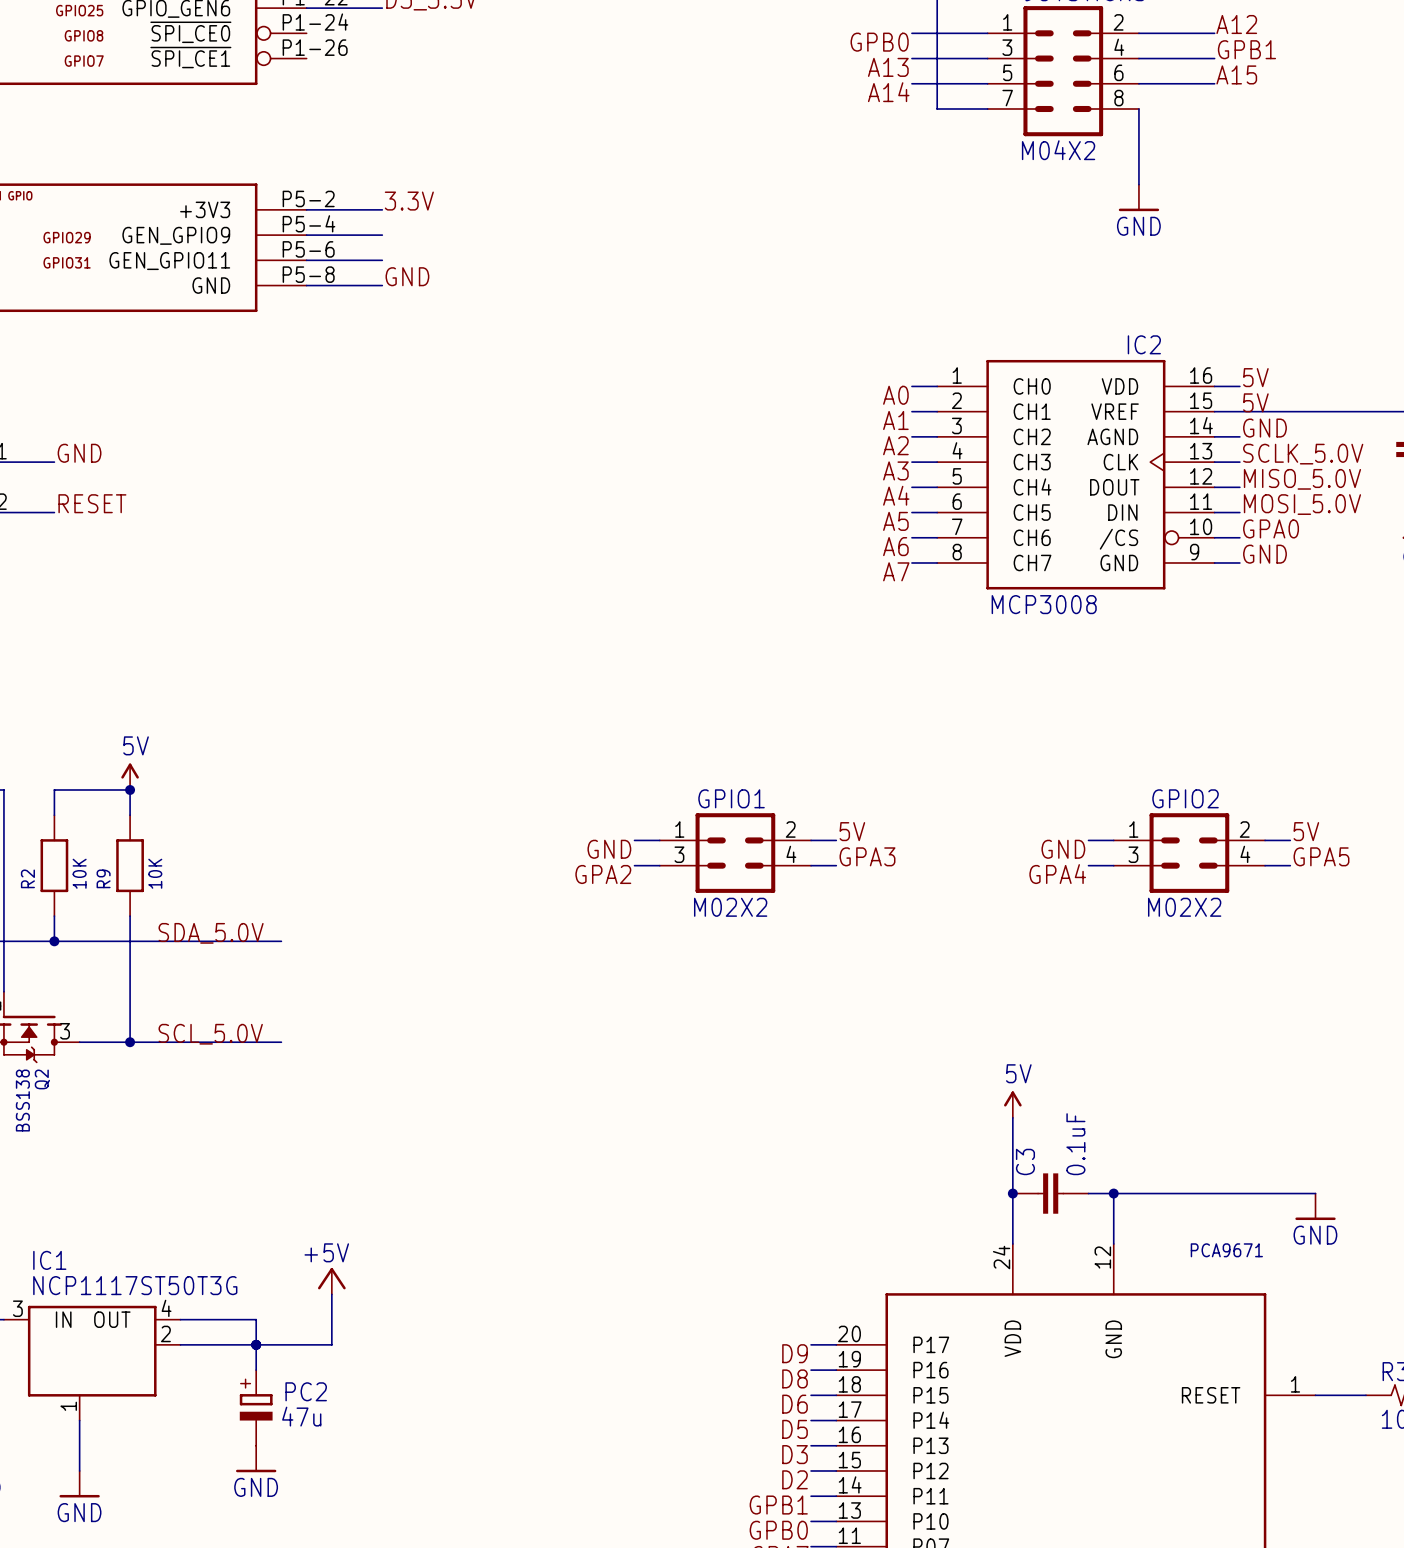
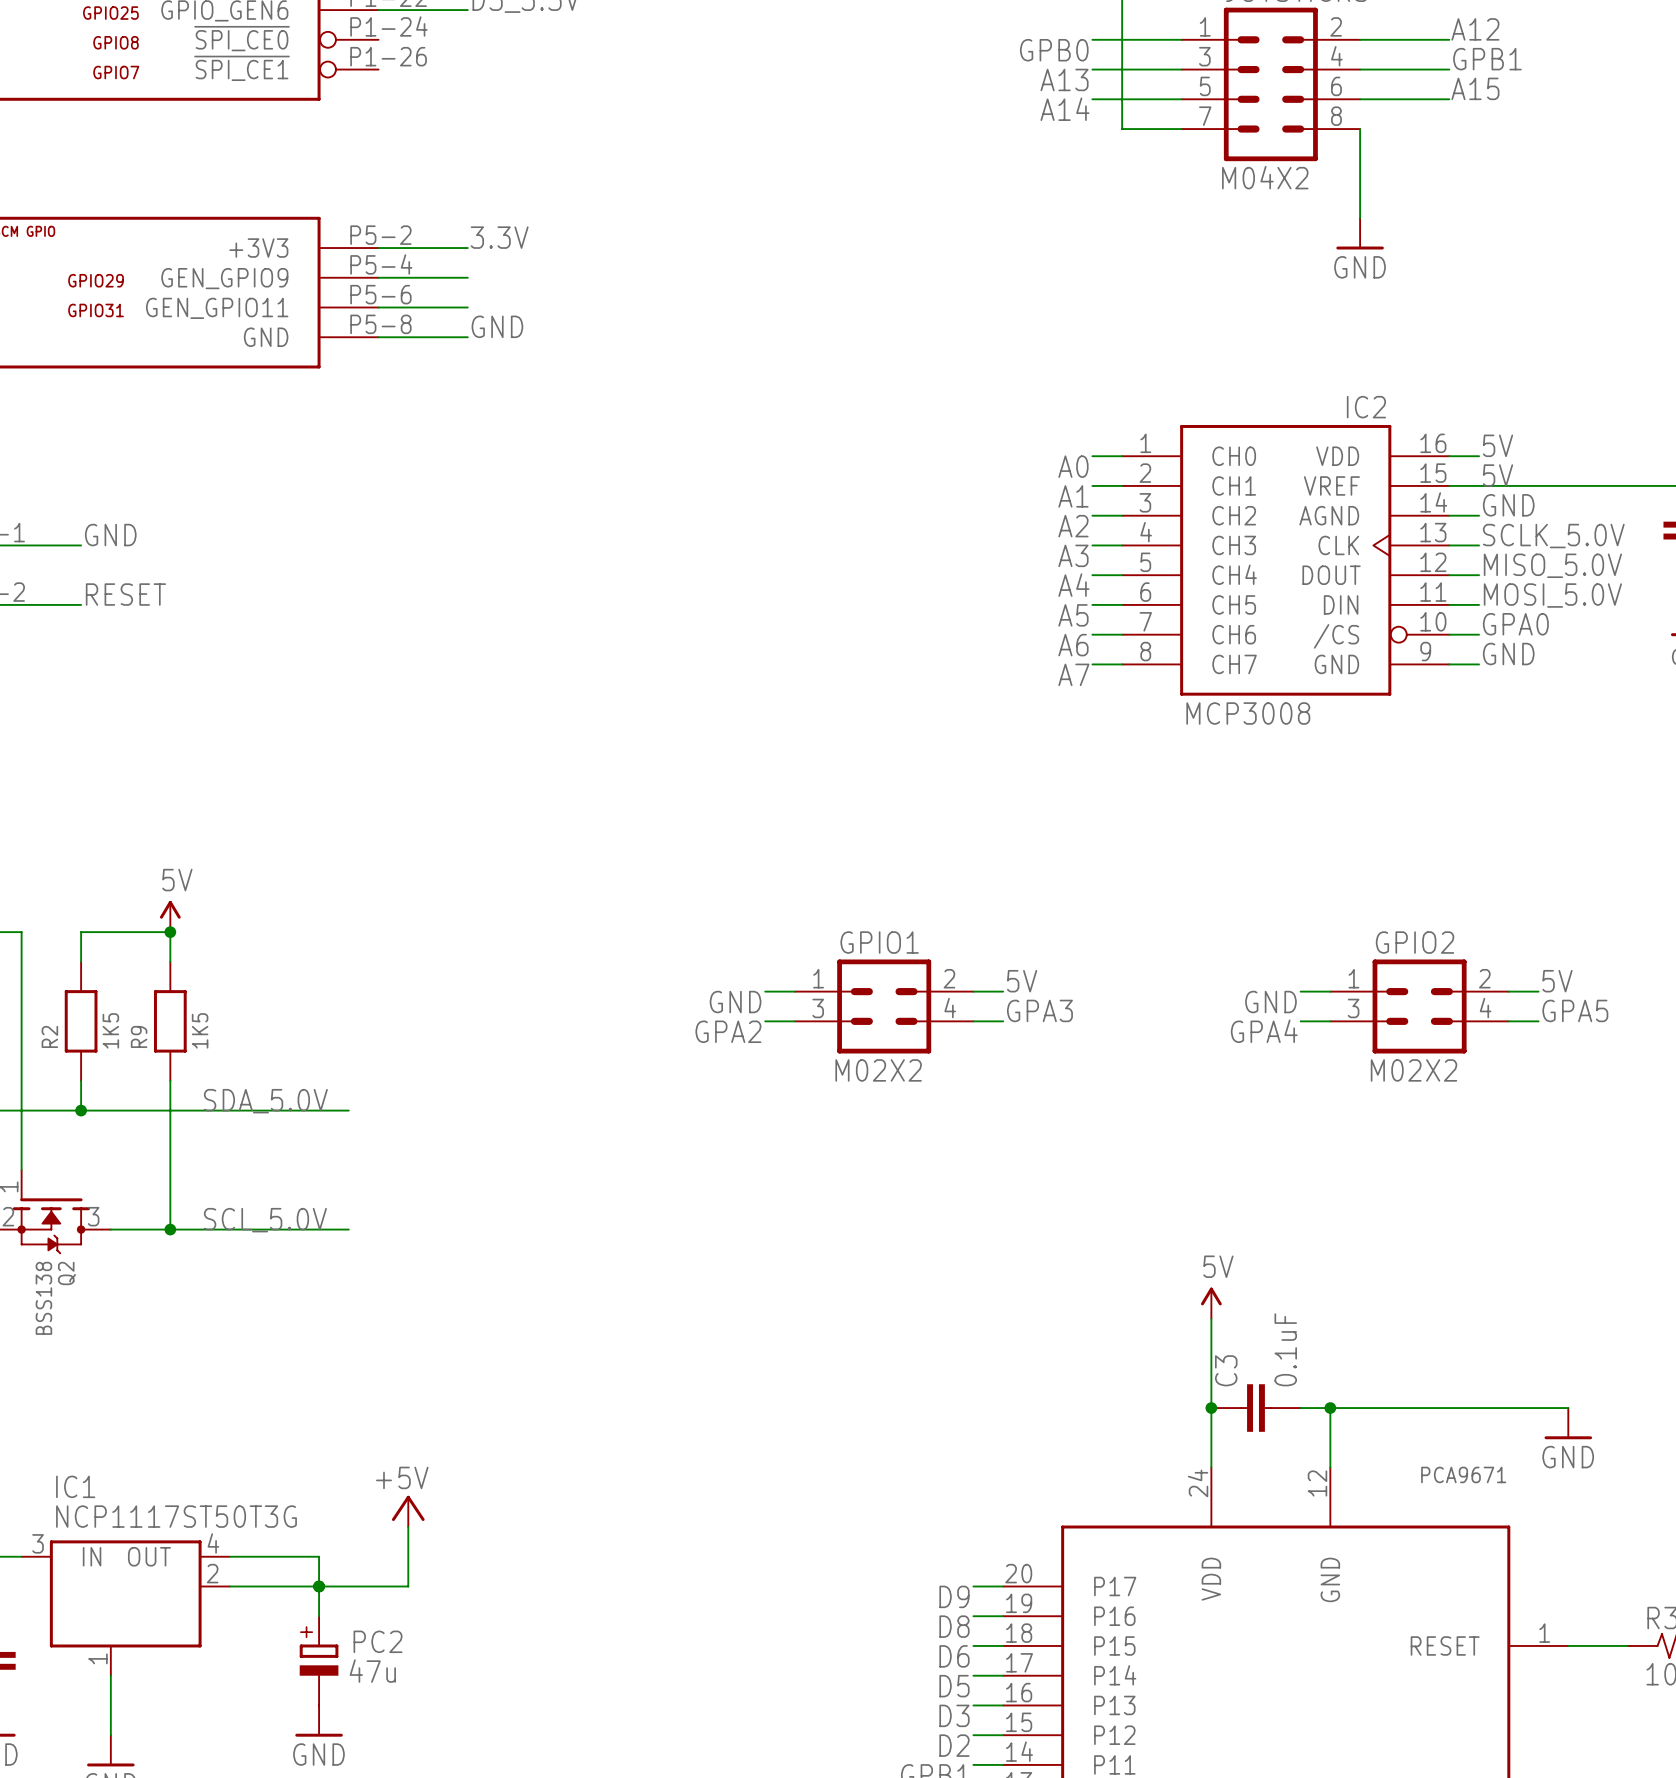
R2 value: 10K (79, 873) -> 1K5 (110, 1030)
R9 value: 10K (155, 873) -> 1K5 (200, 1030)

